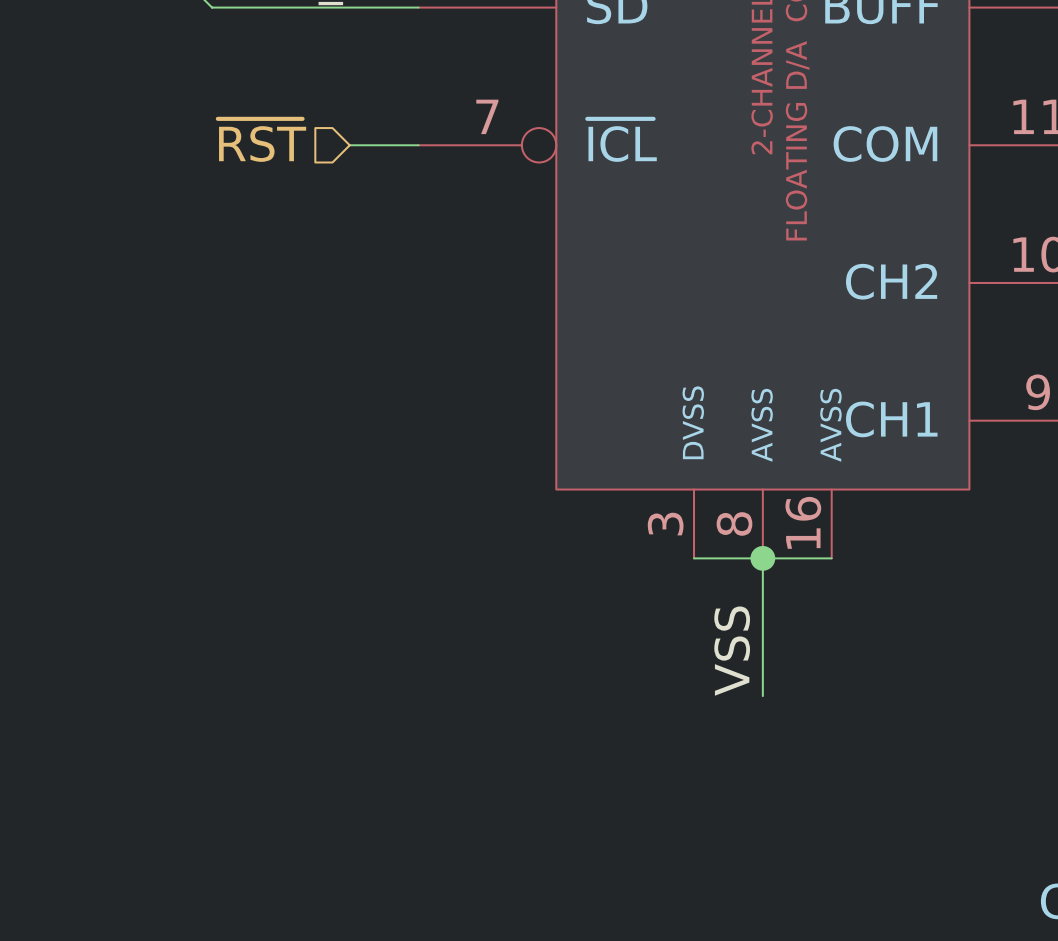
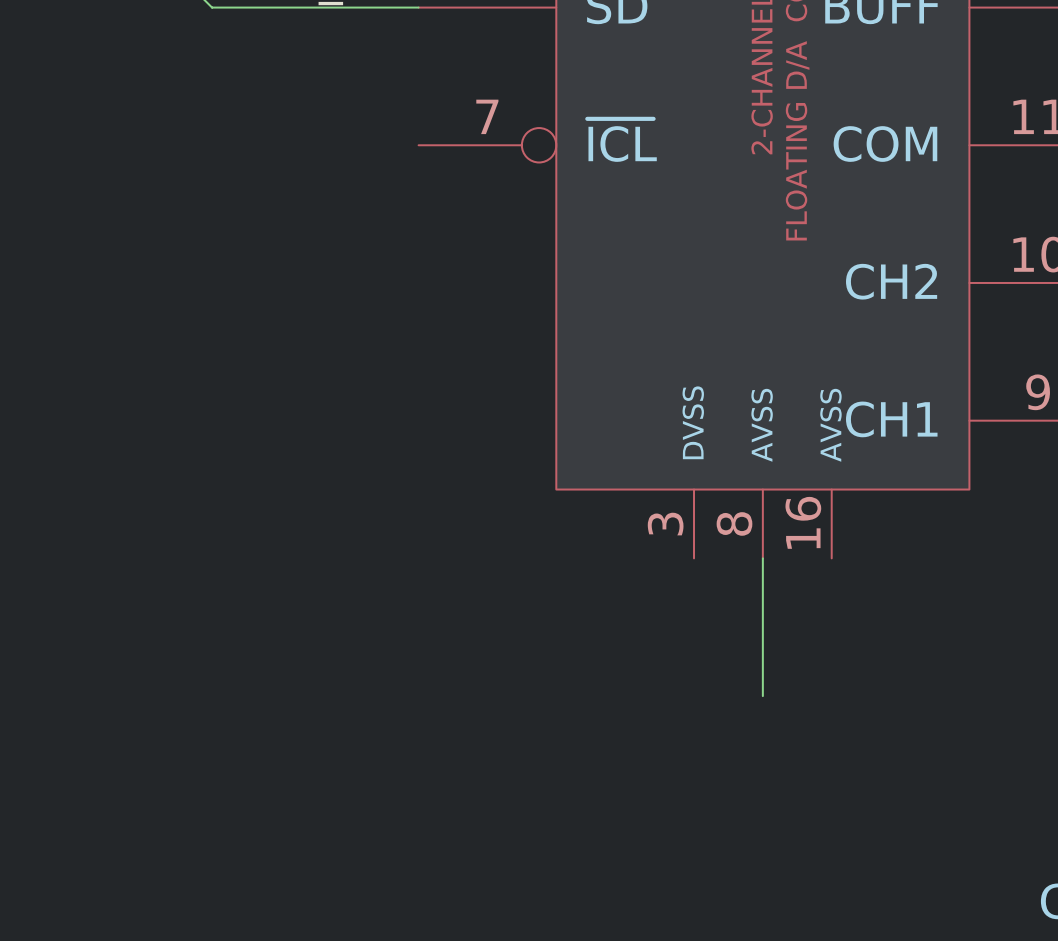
hierarchical label: ~{RST} (262, 140) -> none
wire: (349, 145) (418, 145) -> none
wire: (694, 558) (831, 558) -> none
junction: (762, 558) -> none
label: VSS (732, 651) -> none

